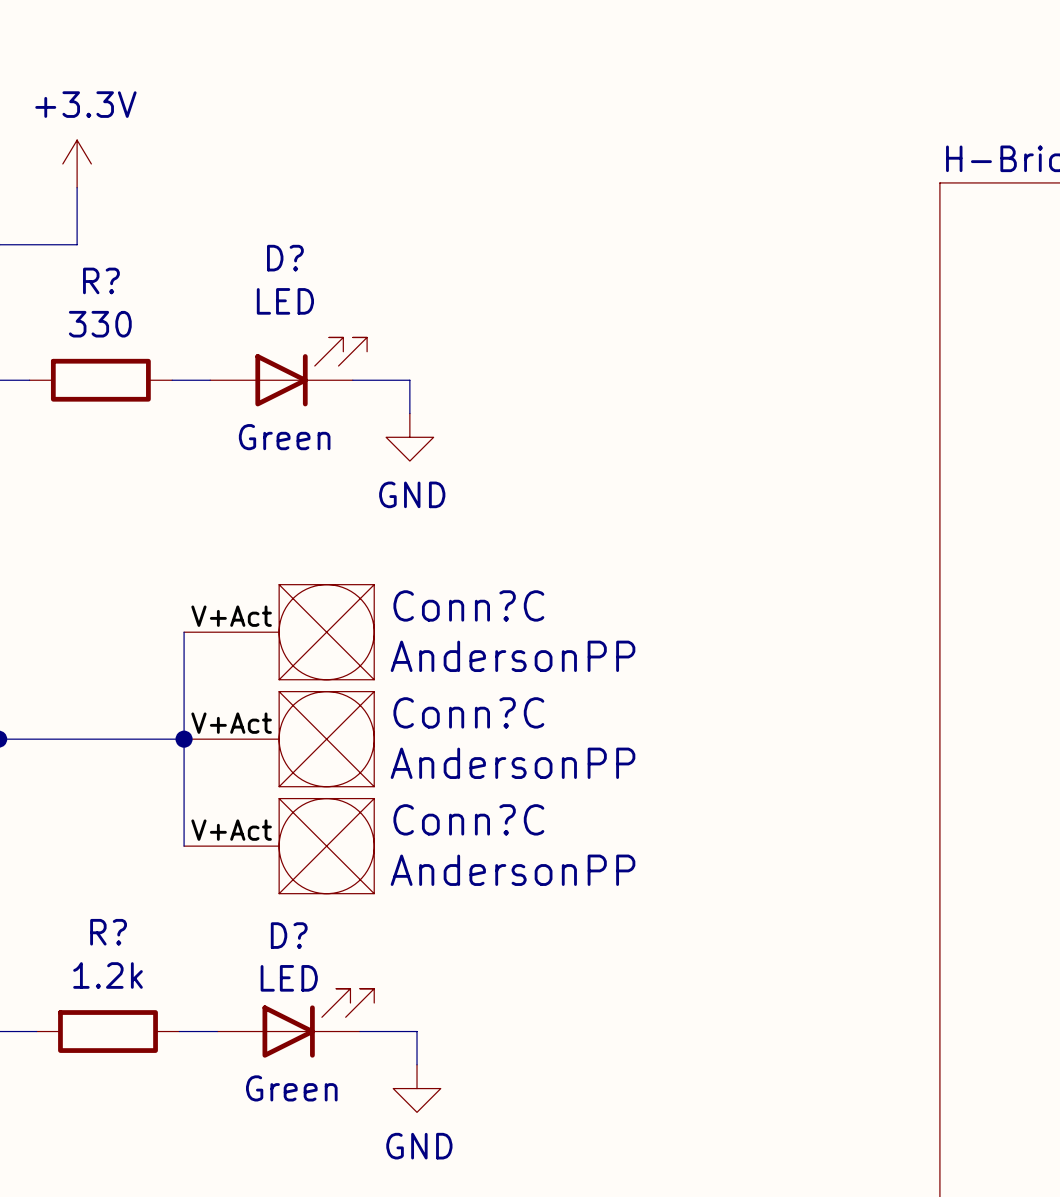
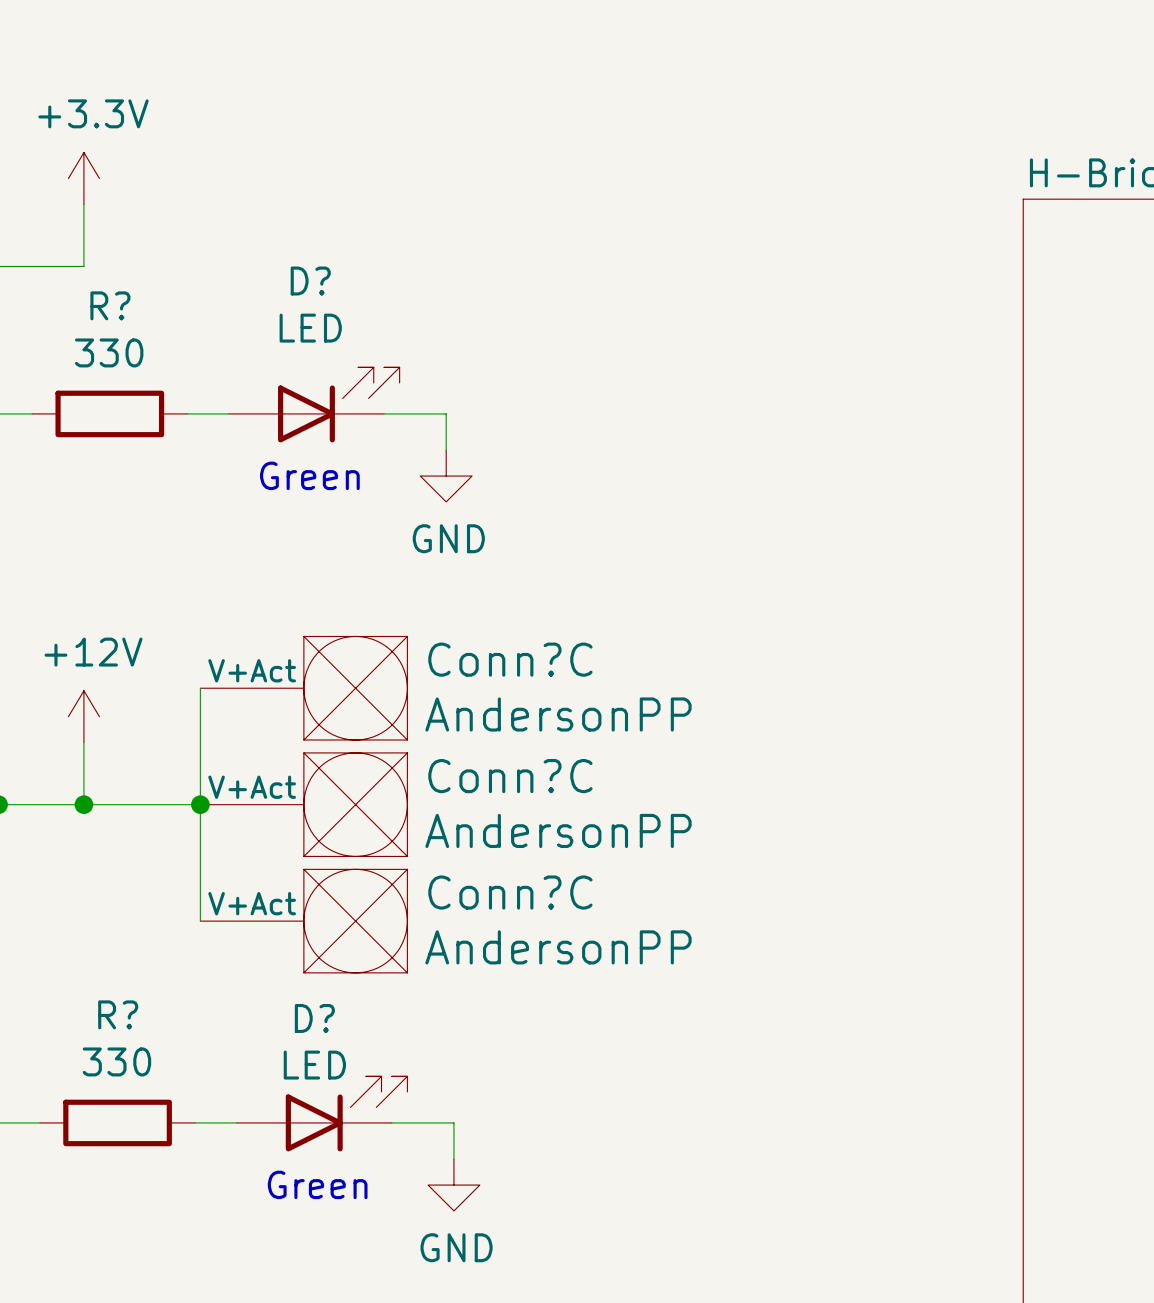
power symbol: none -> +12V (83, 716)
wire: none -> (83, 742) (83, 804)
junction: none -> (83, 804)
R? value: 1.2k (108, 975) -> 330 (116, 1061)

